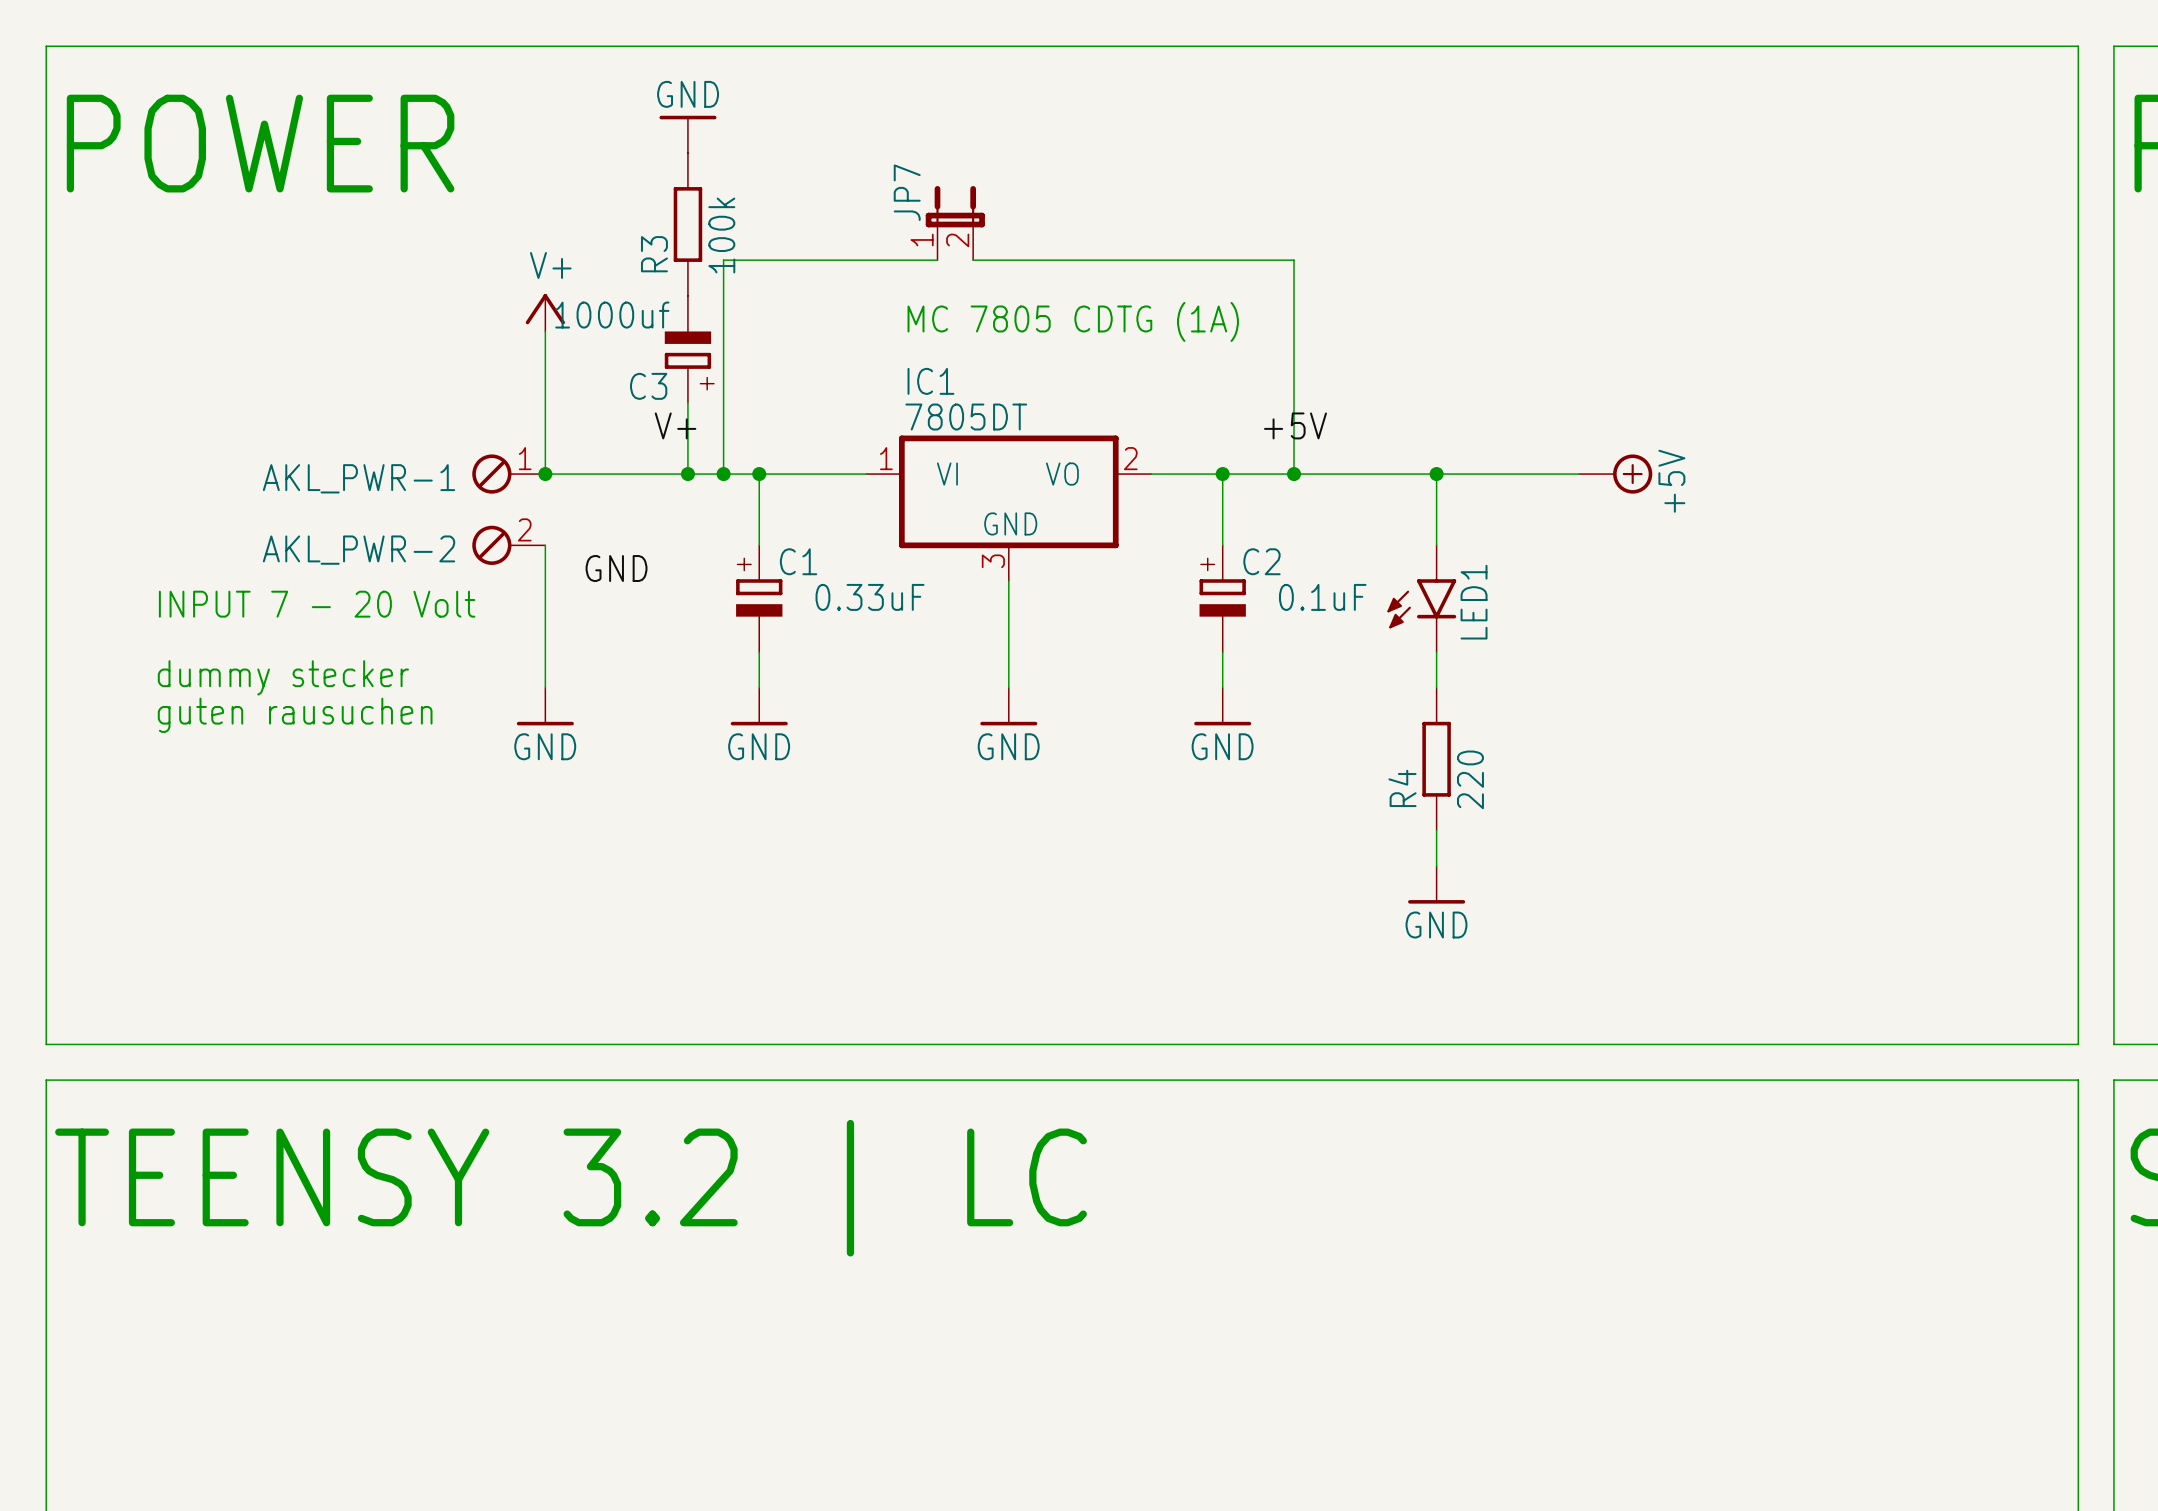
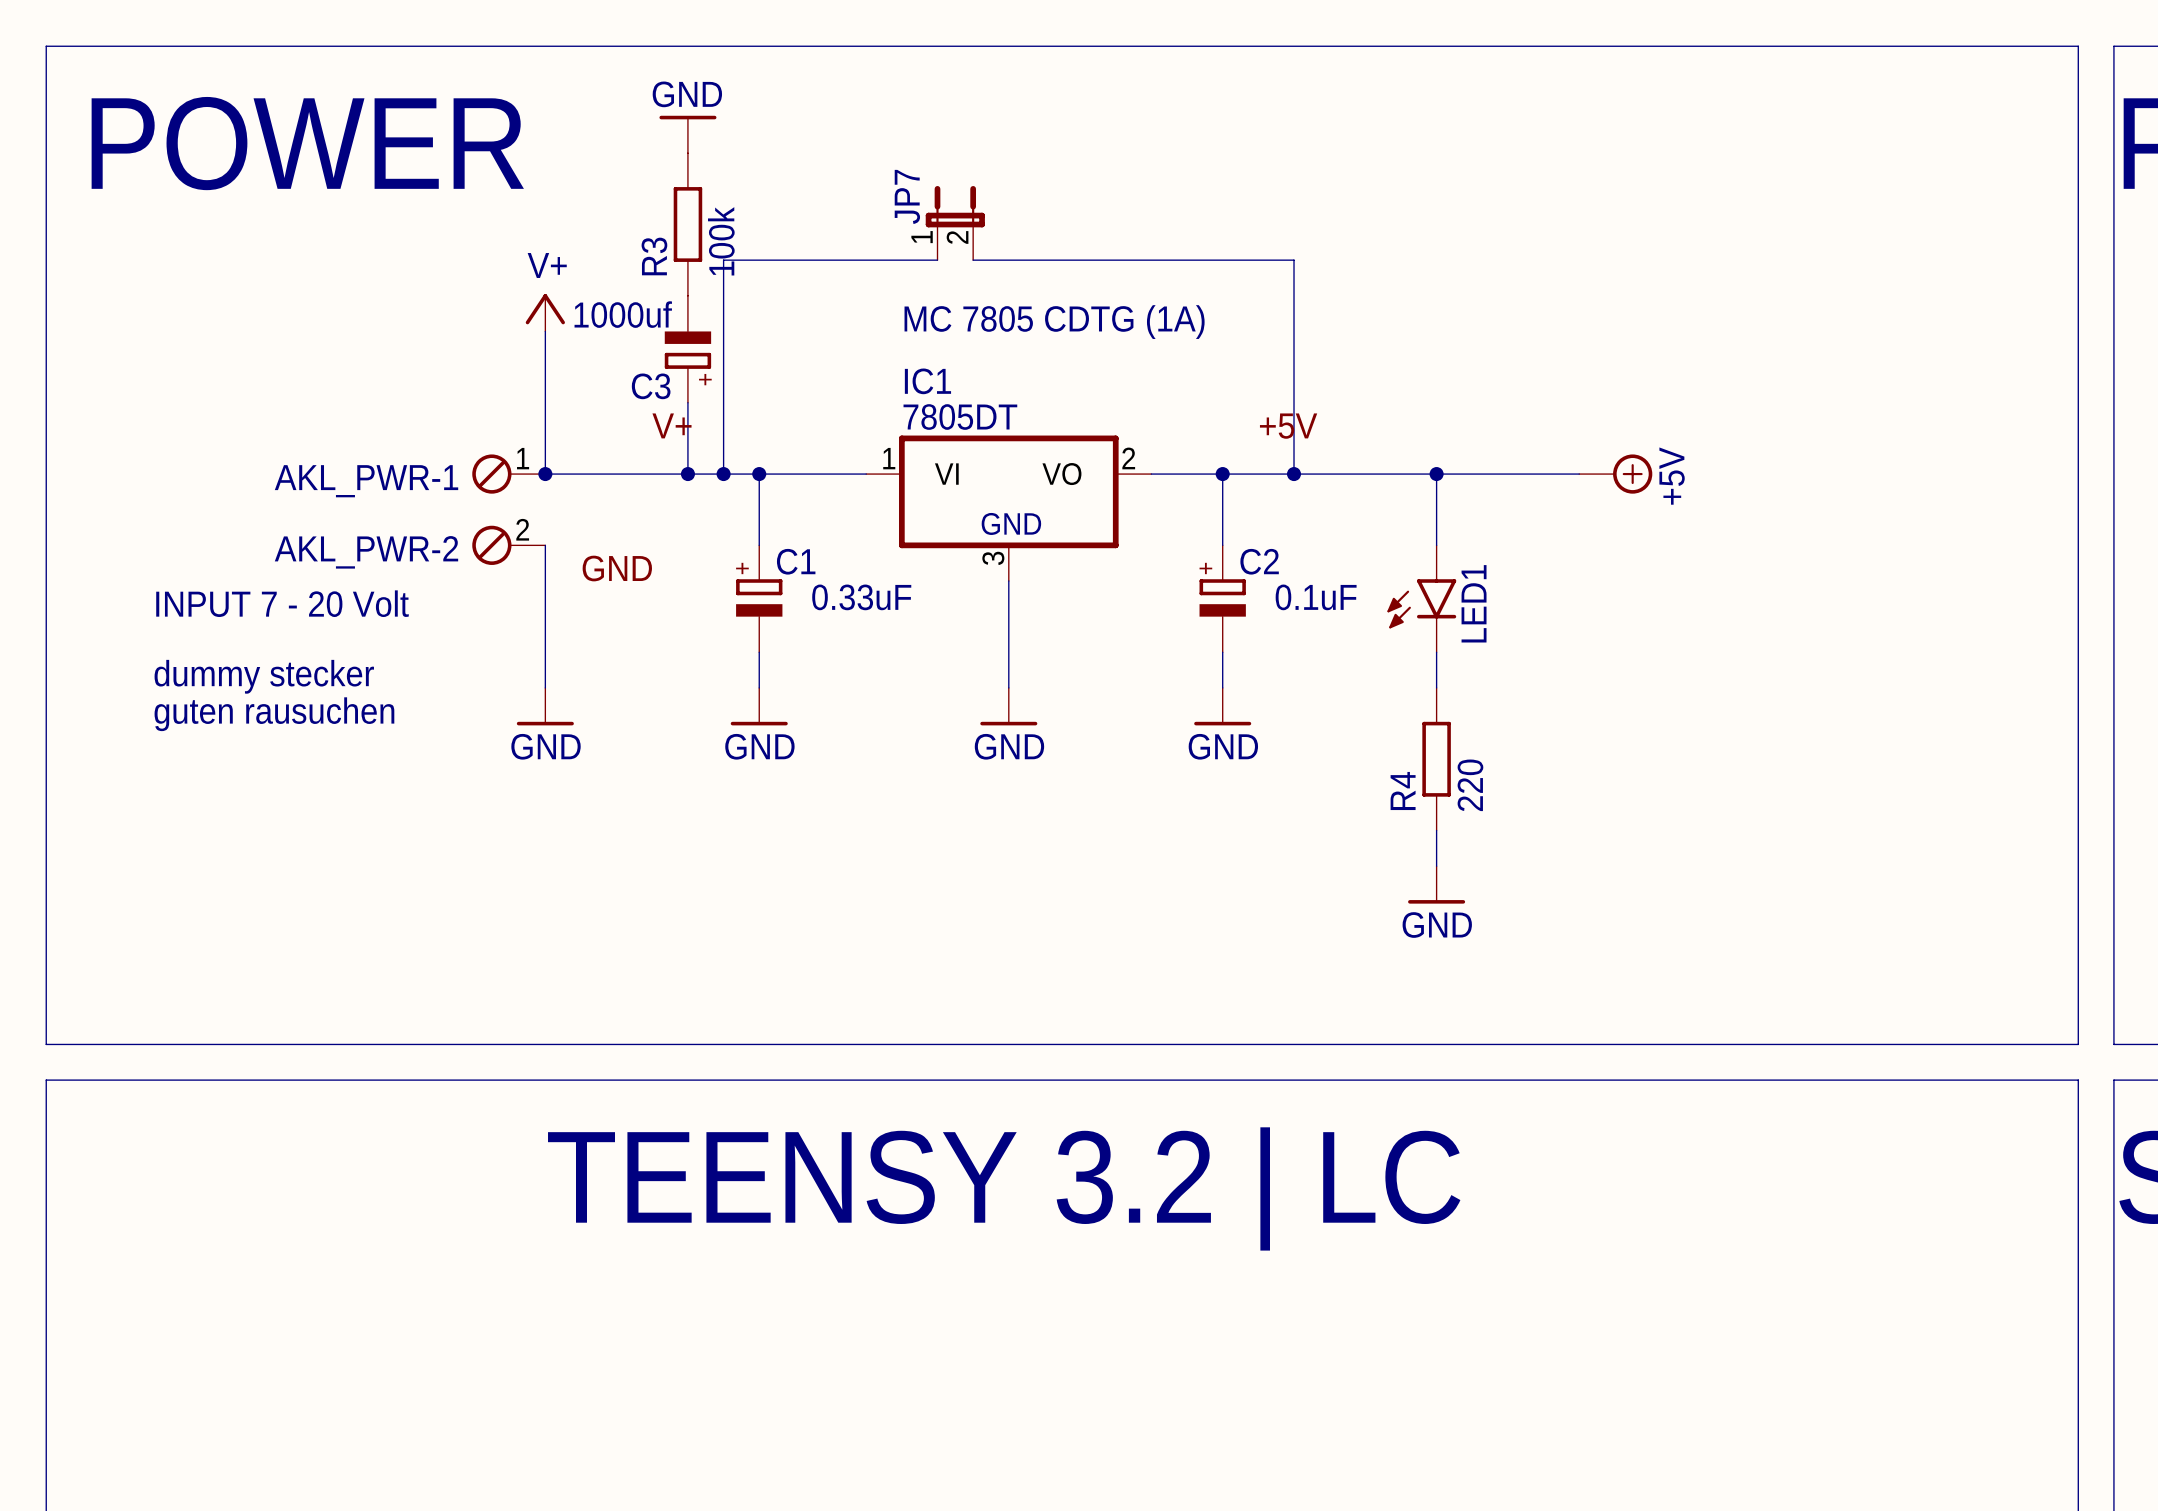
text position: POWER (260, 143) -> POWER (307, 143)
text: TEENSY 3.2 | LC (571, 1188) -> none
text: none -> TEENSY 3.2 | LC (1004, 1188)

